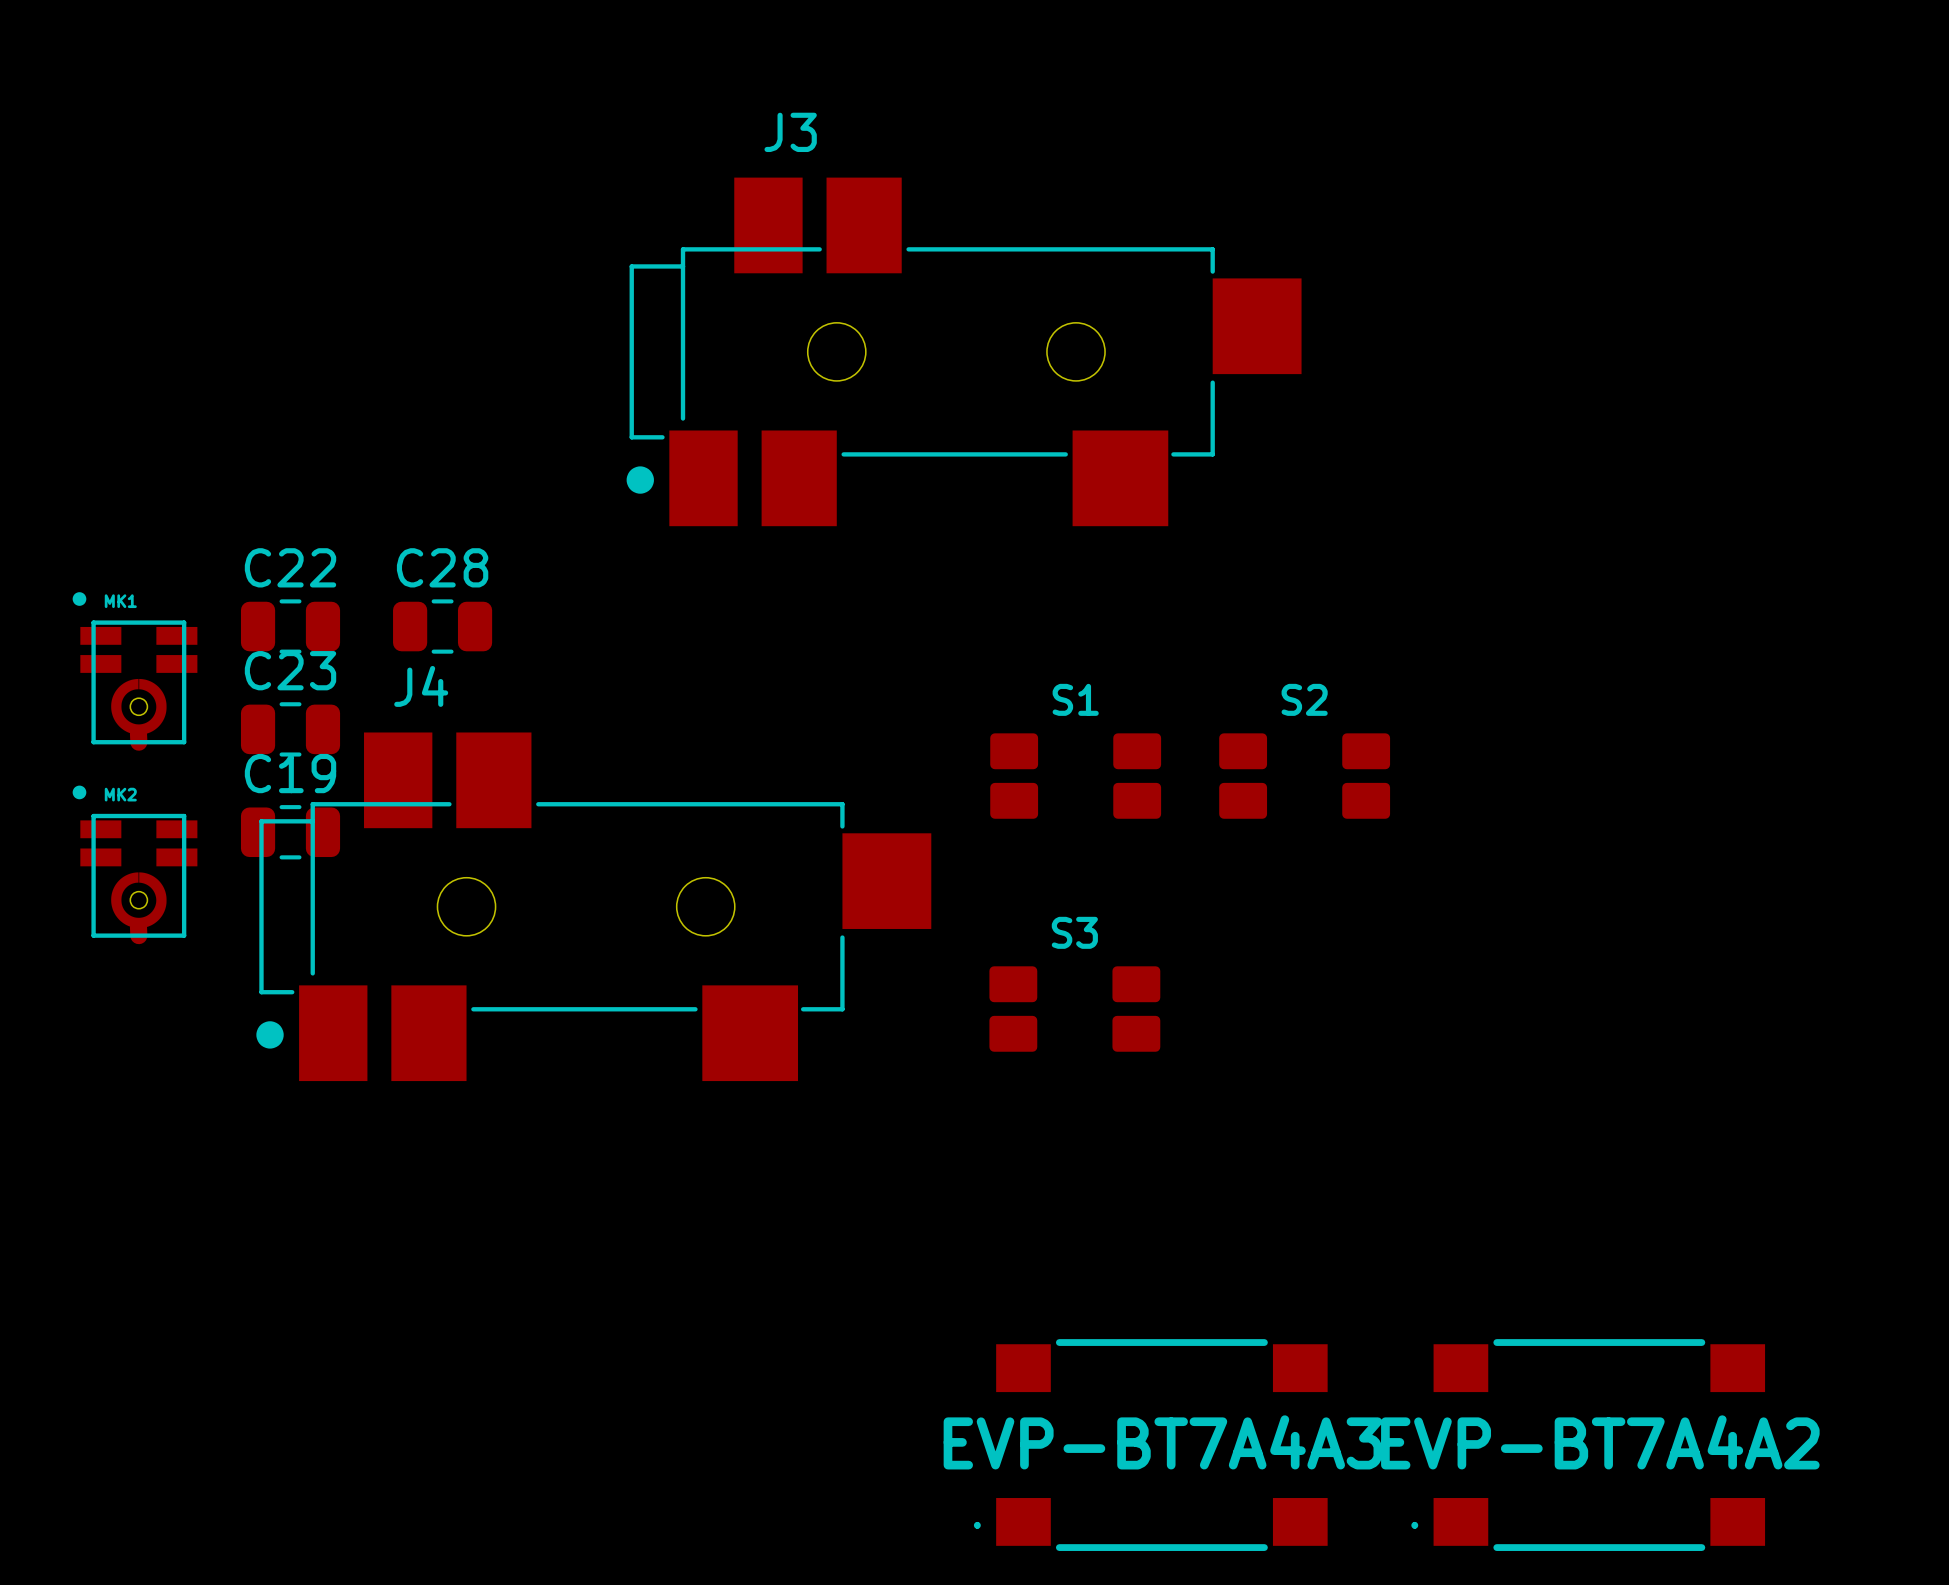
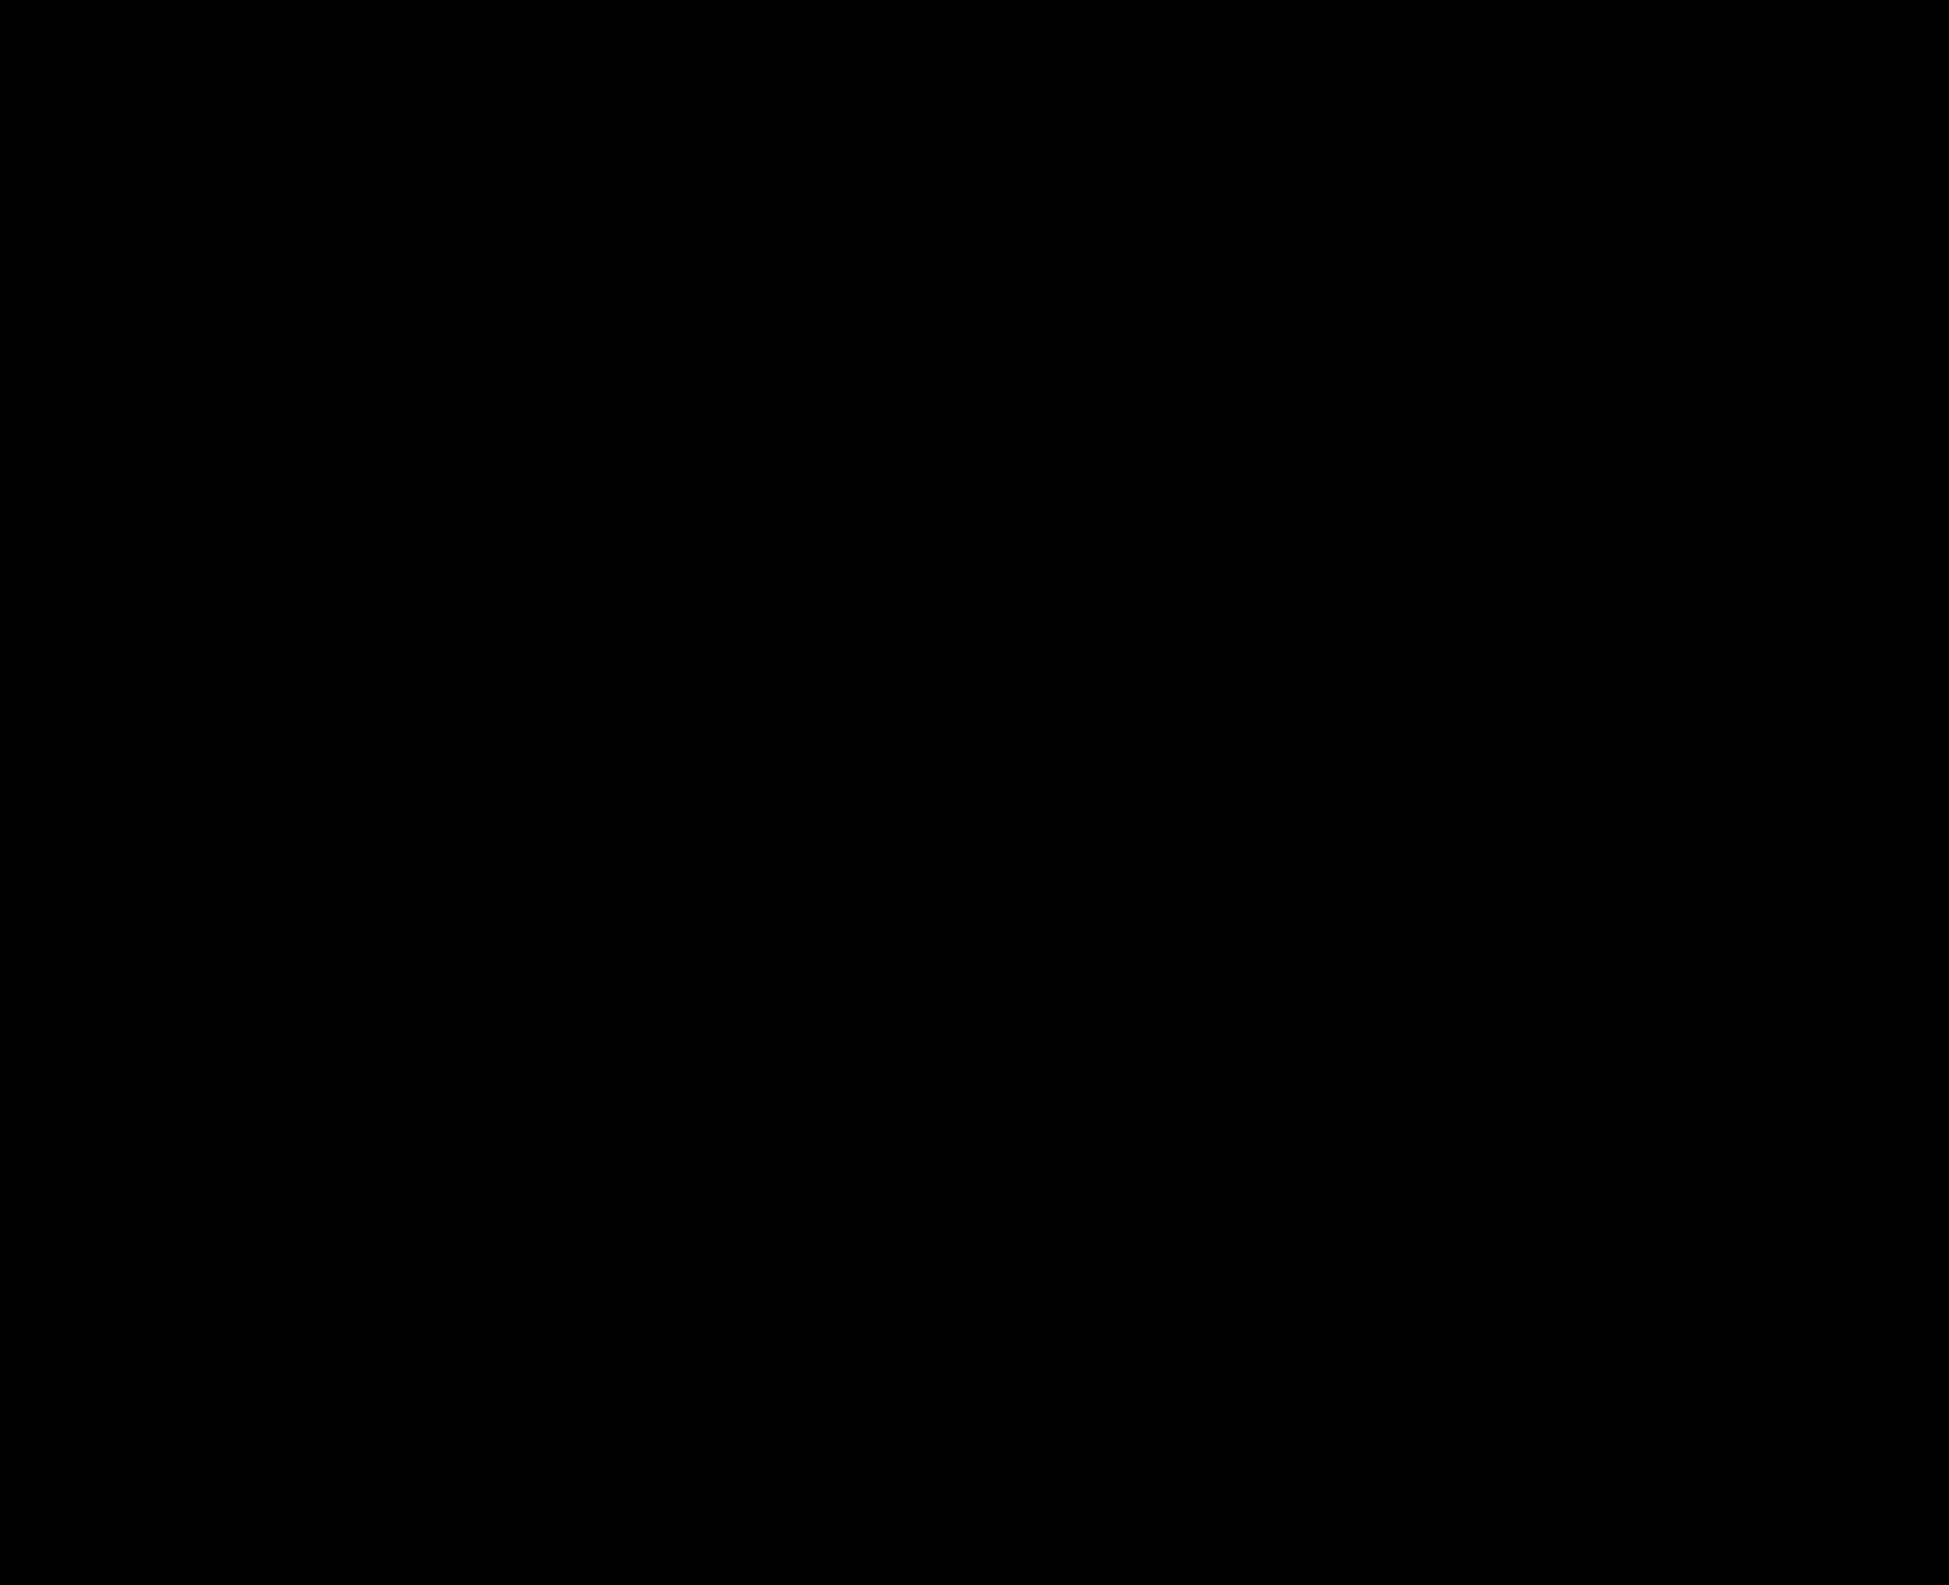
J3: (964, 351) -> none
C22: (290, 626) -> none
C28: (442, 626) -> none
MK1: (135, 671) -> none
C23: (290, 729) -> none
S1: (1075, 776) -> none
S2: (1304, 776) -> none
C19: (290, 832) -> none
MK2: (135, 864) -> none
J4: (593, 906) -> none
S3: (1074, 1009) -> none
EVP-BT7A4A3: (1150, 1445) -> none
EVP-BT7A4A2: (1588, 1445) -> none

